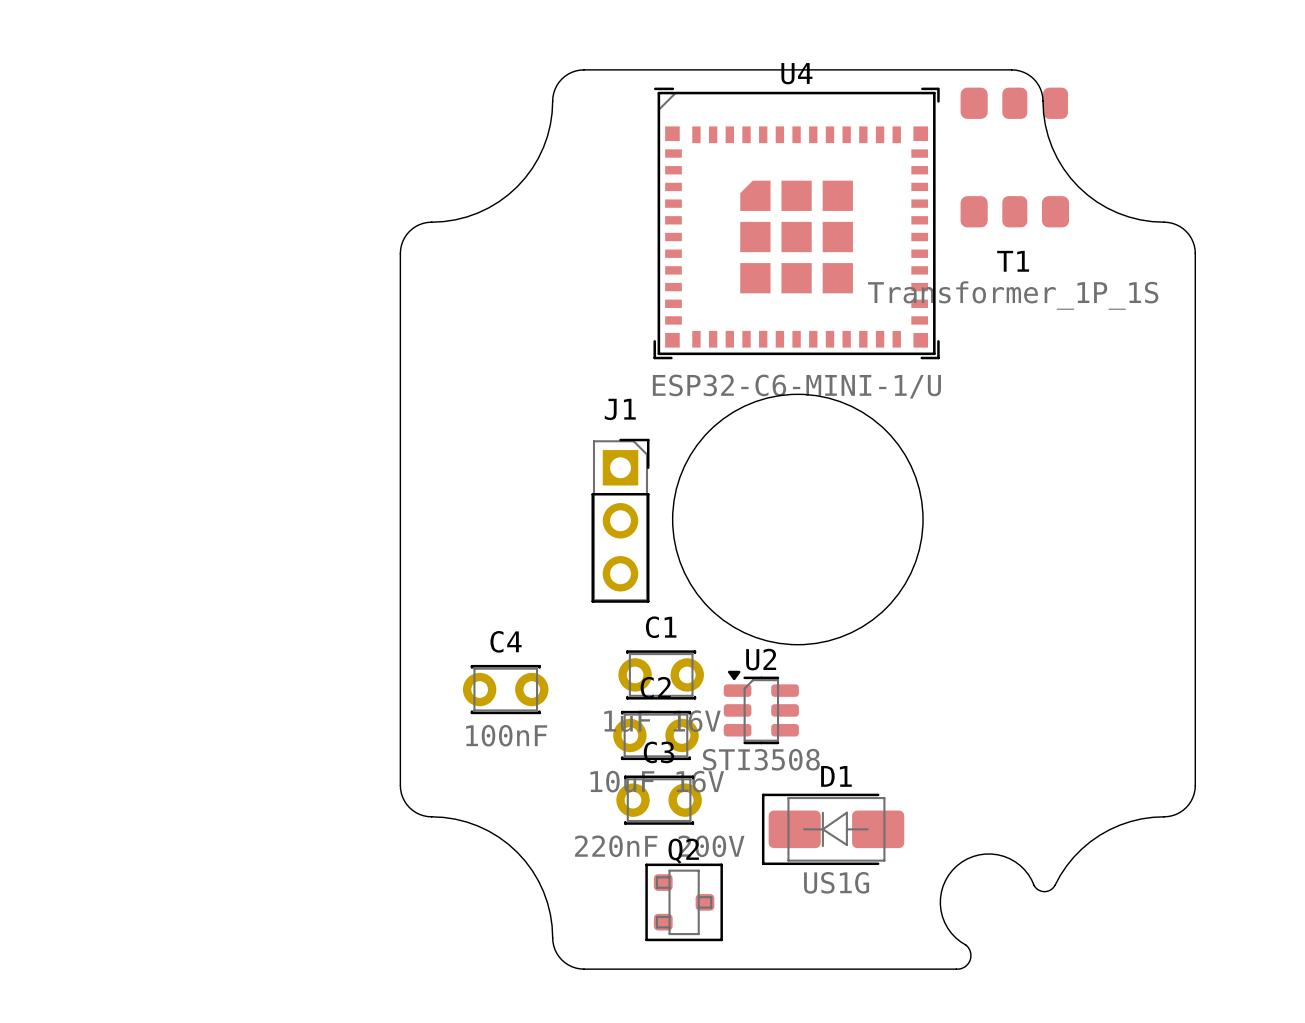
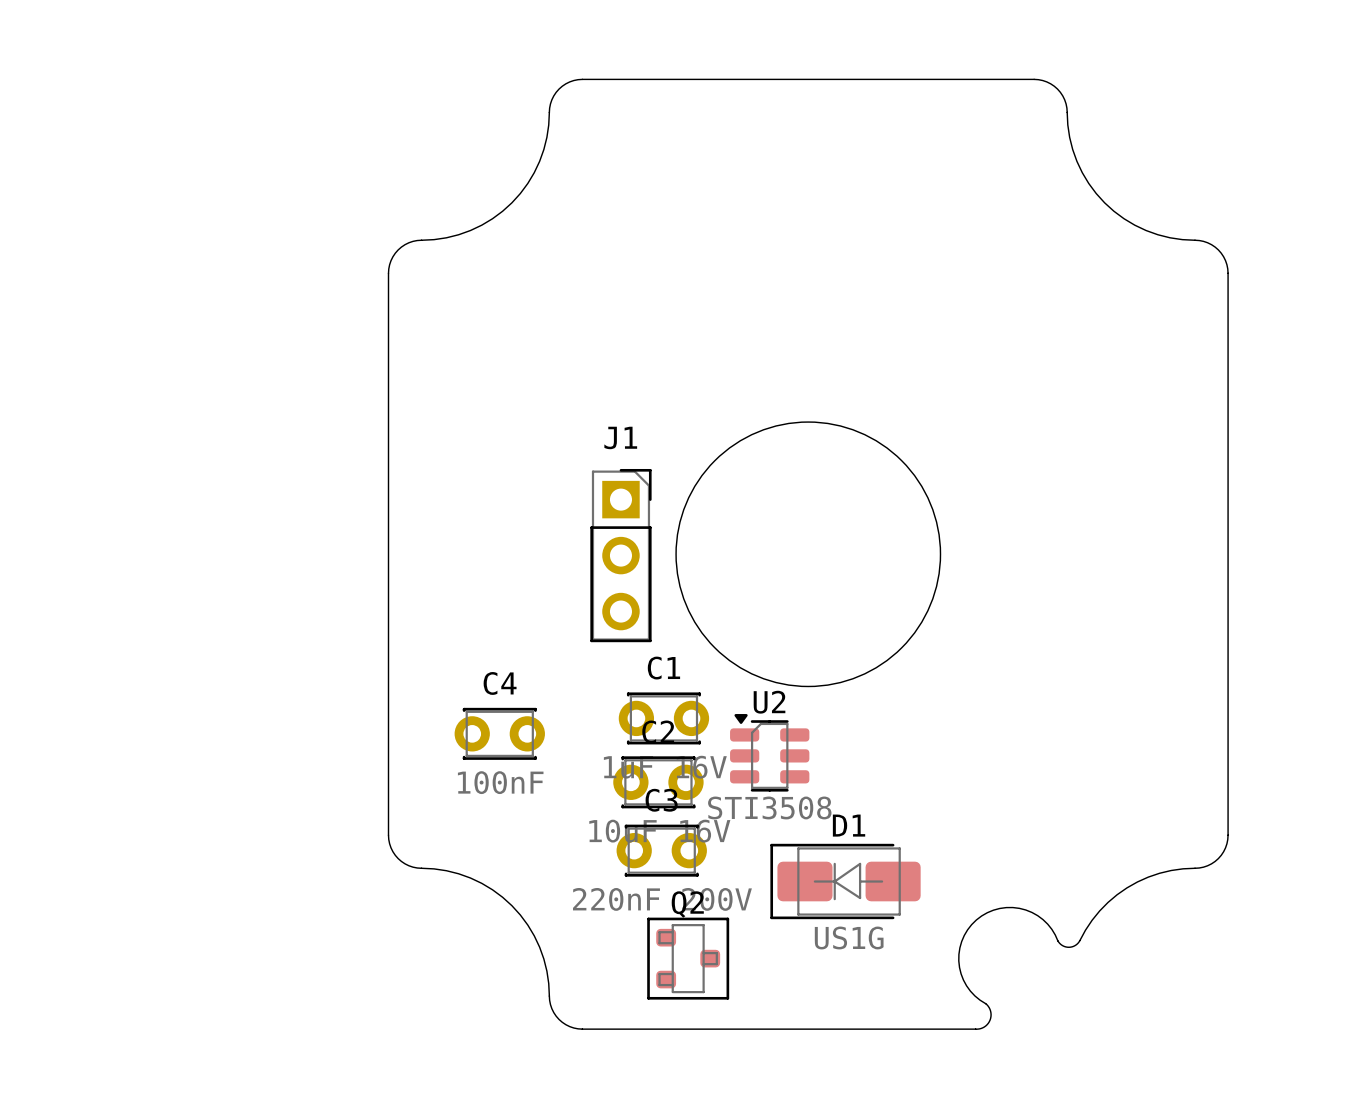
T1: Transformer_1P_1S (1014, 157) -> none
U4: ESP32-C6-MINI-1/U (796, 223) -> none

